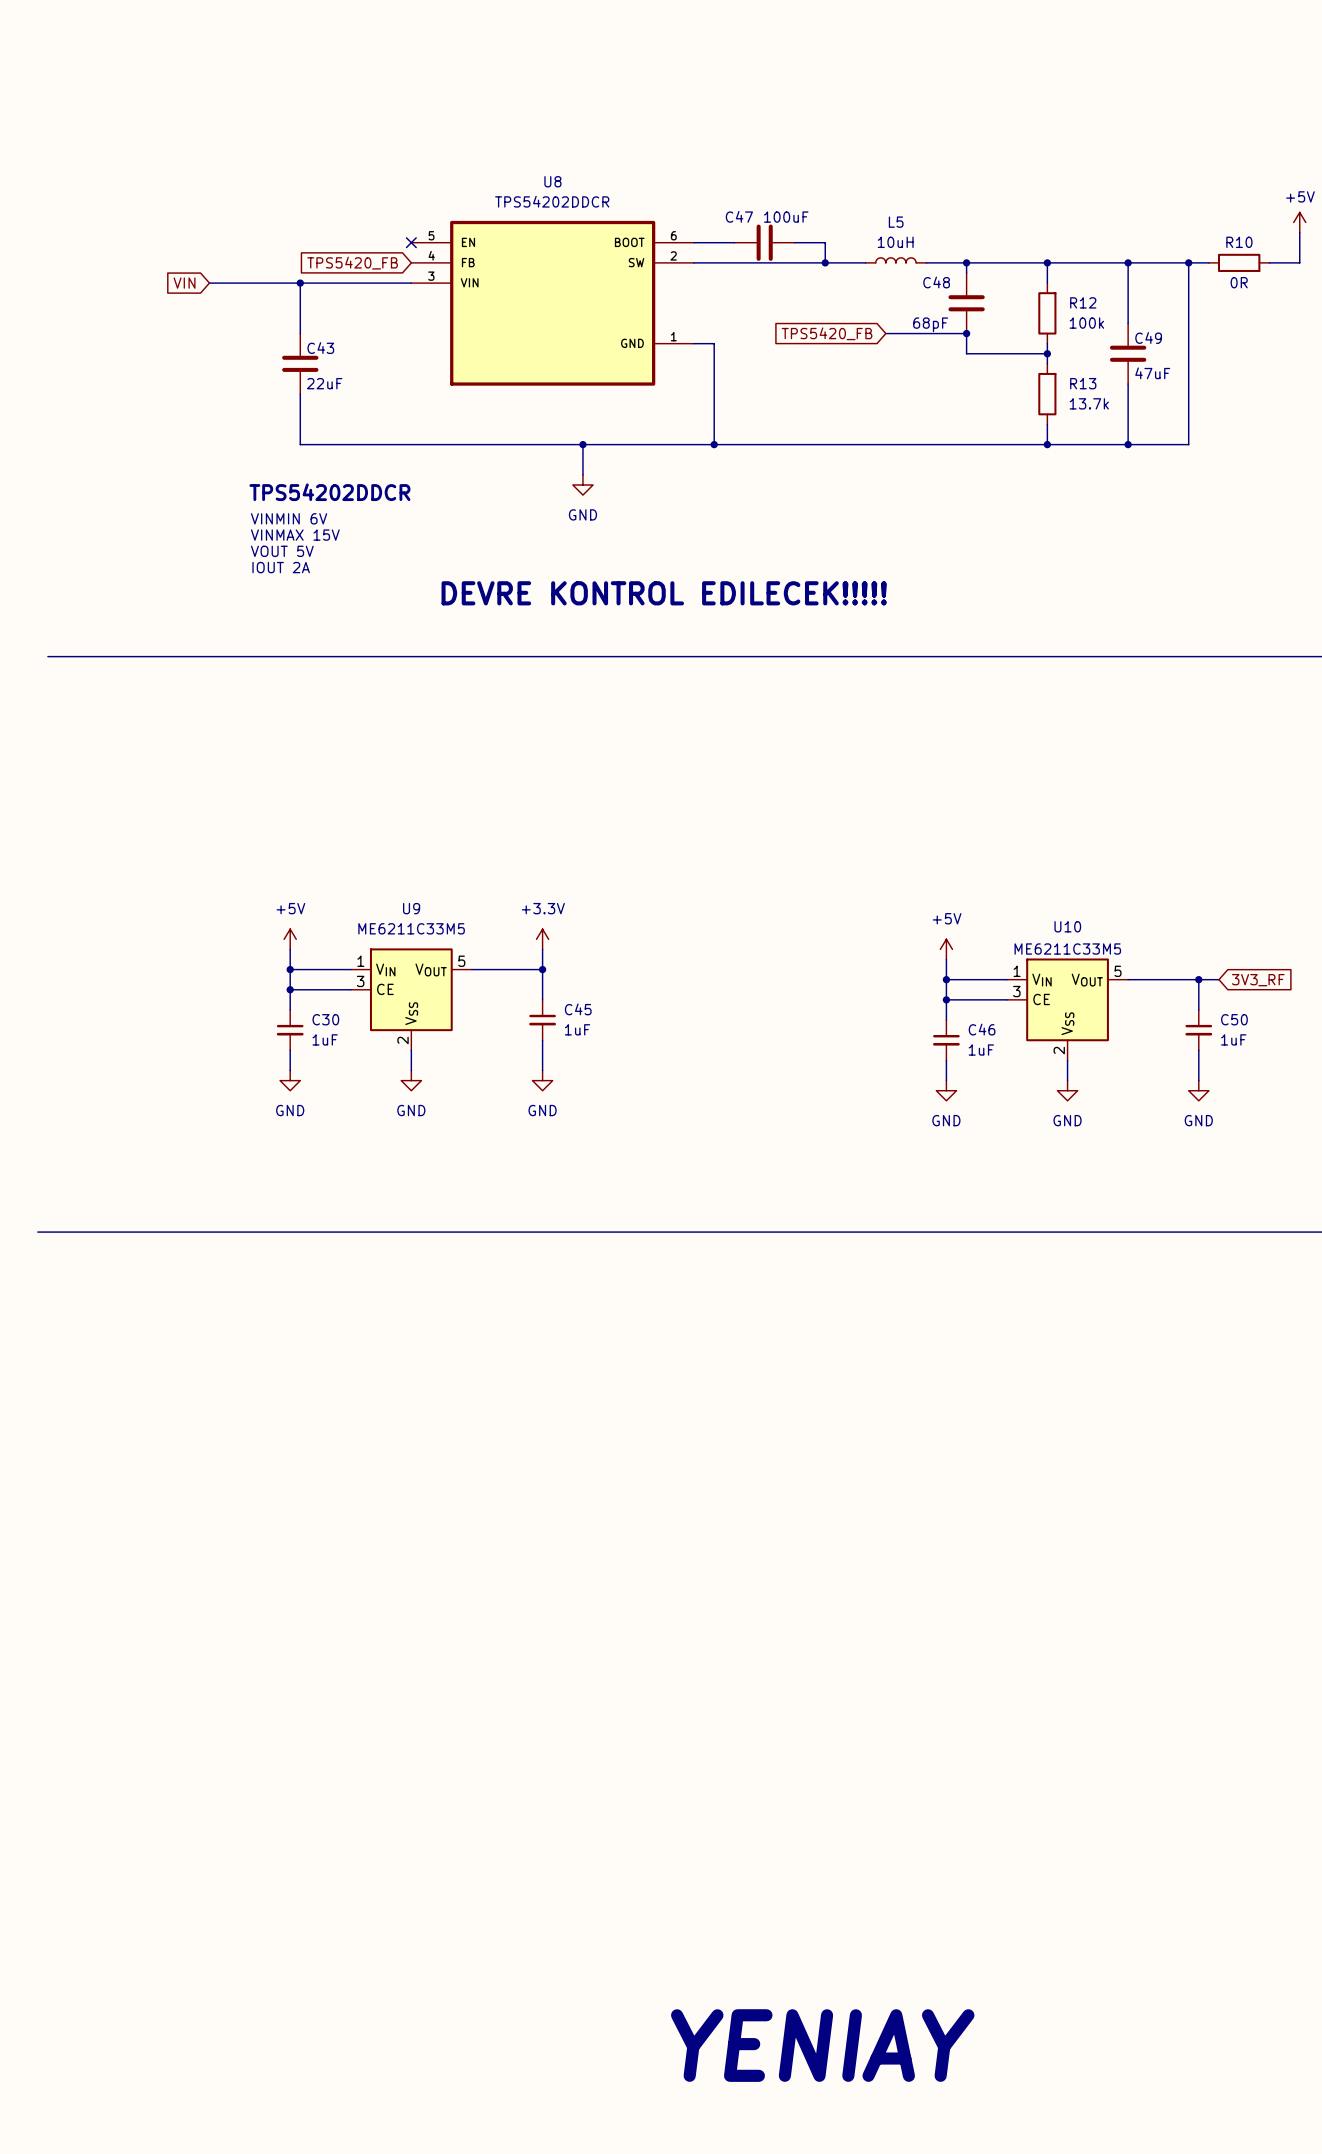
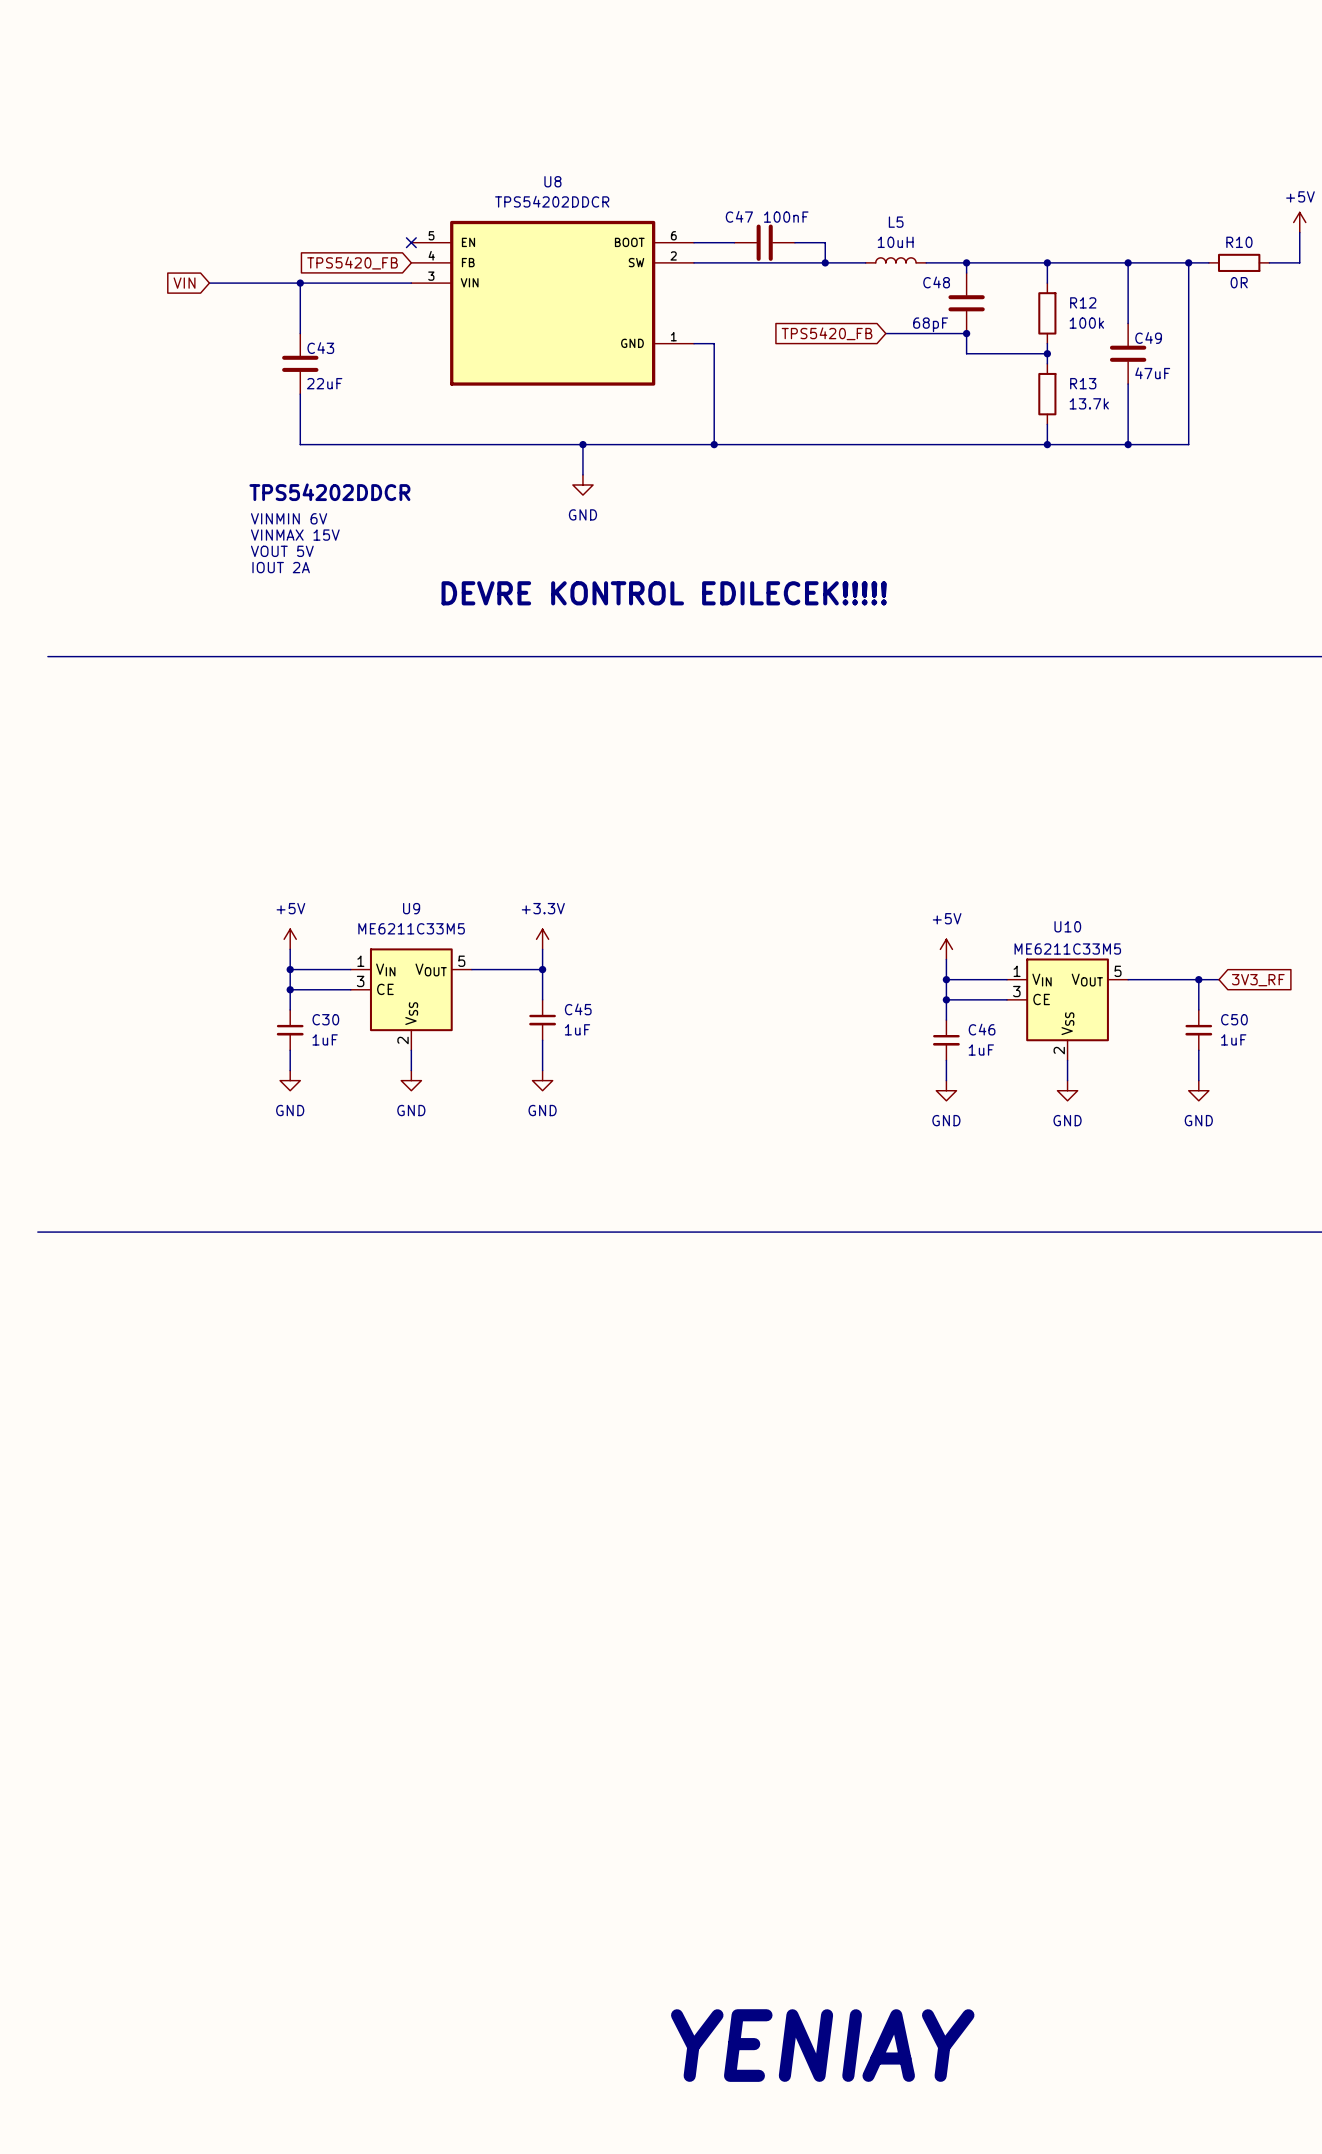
C47 value: 100uF (786, 217) -> 100nF (786, 217)

